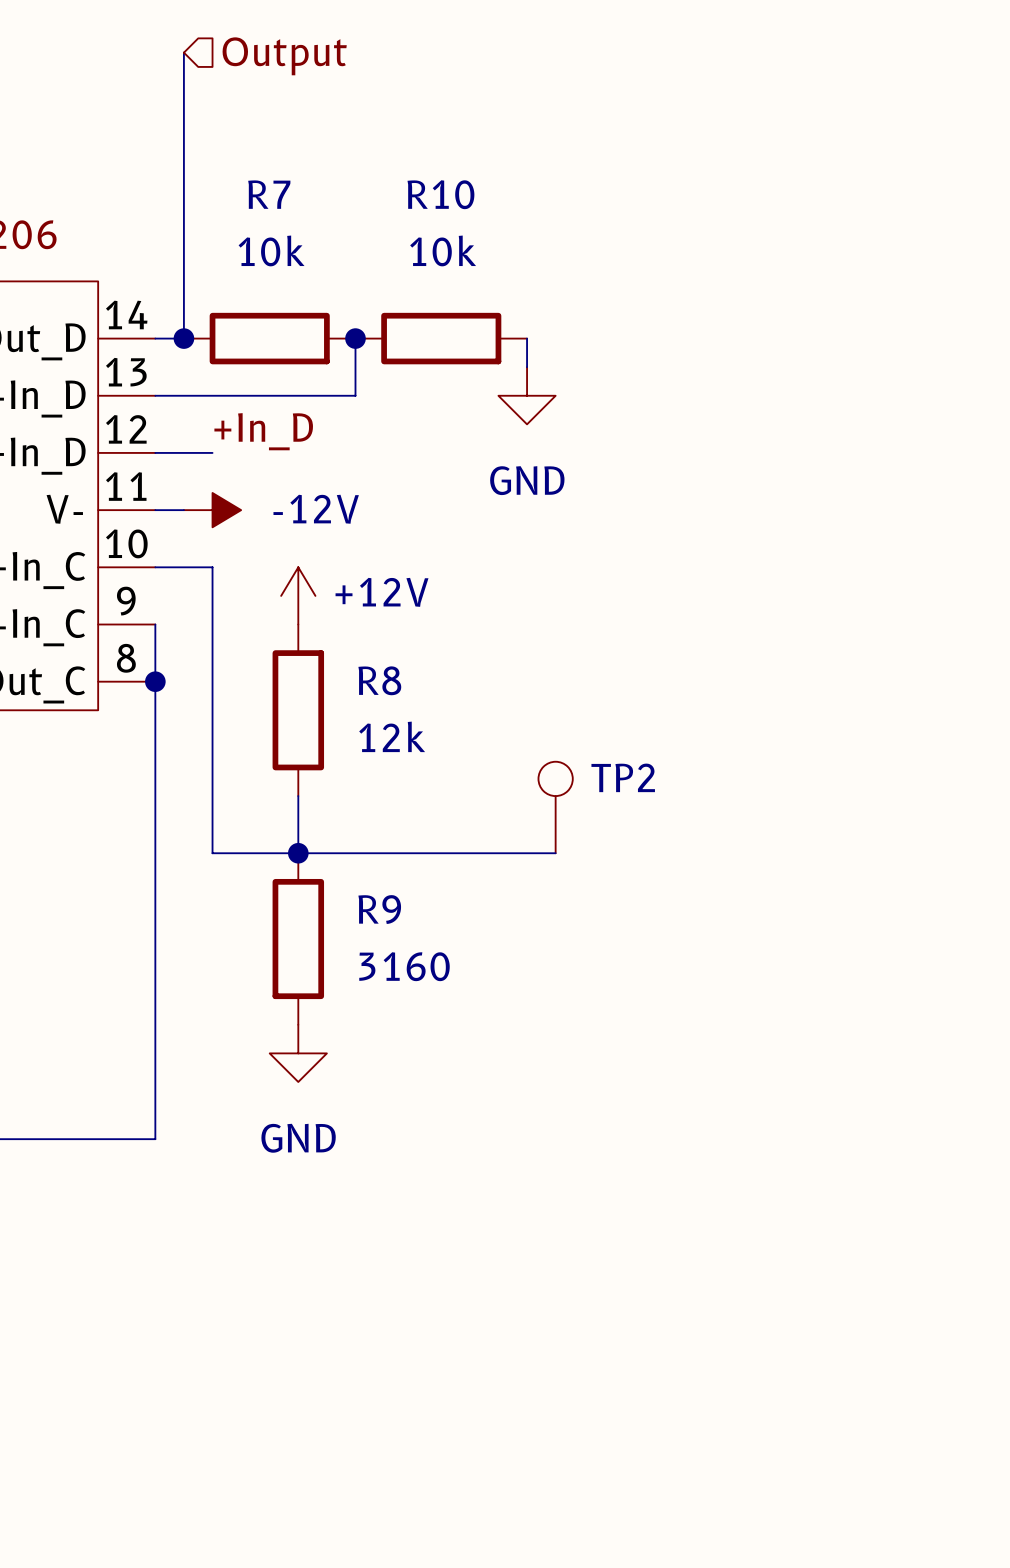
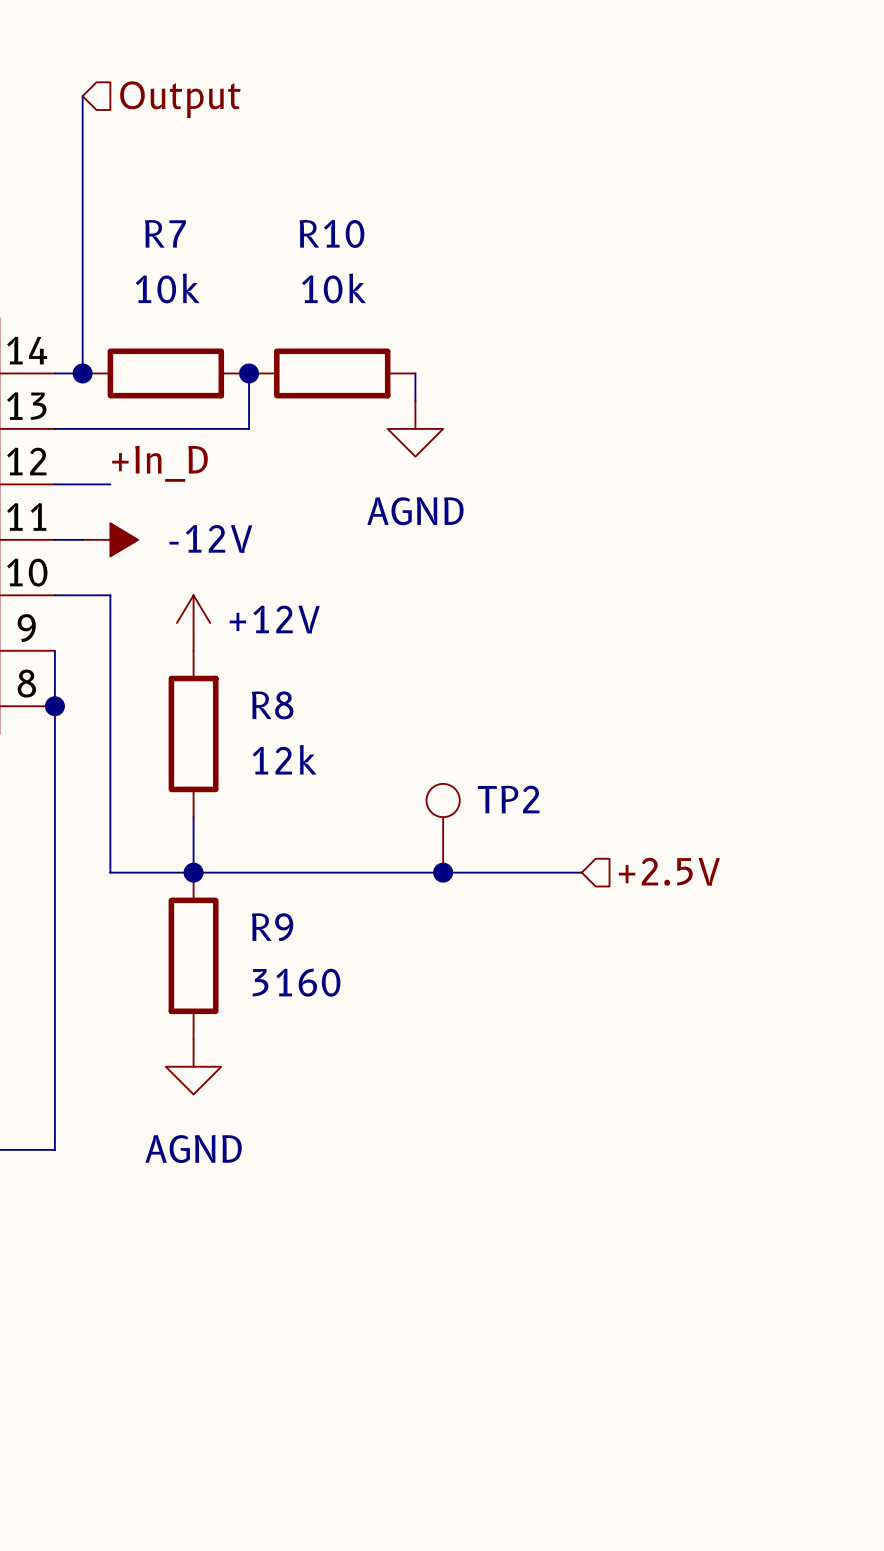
power symbol: GND (527, 395) -> AGND (415, 428)
hierarchical label: none -> +2.5V (669, 871)
wire: none -> (443, 872) (581, 872)
junction: none -> (443, 872)
power symbol: GND (298, 1053) -> AGND (193, 1066)

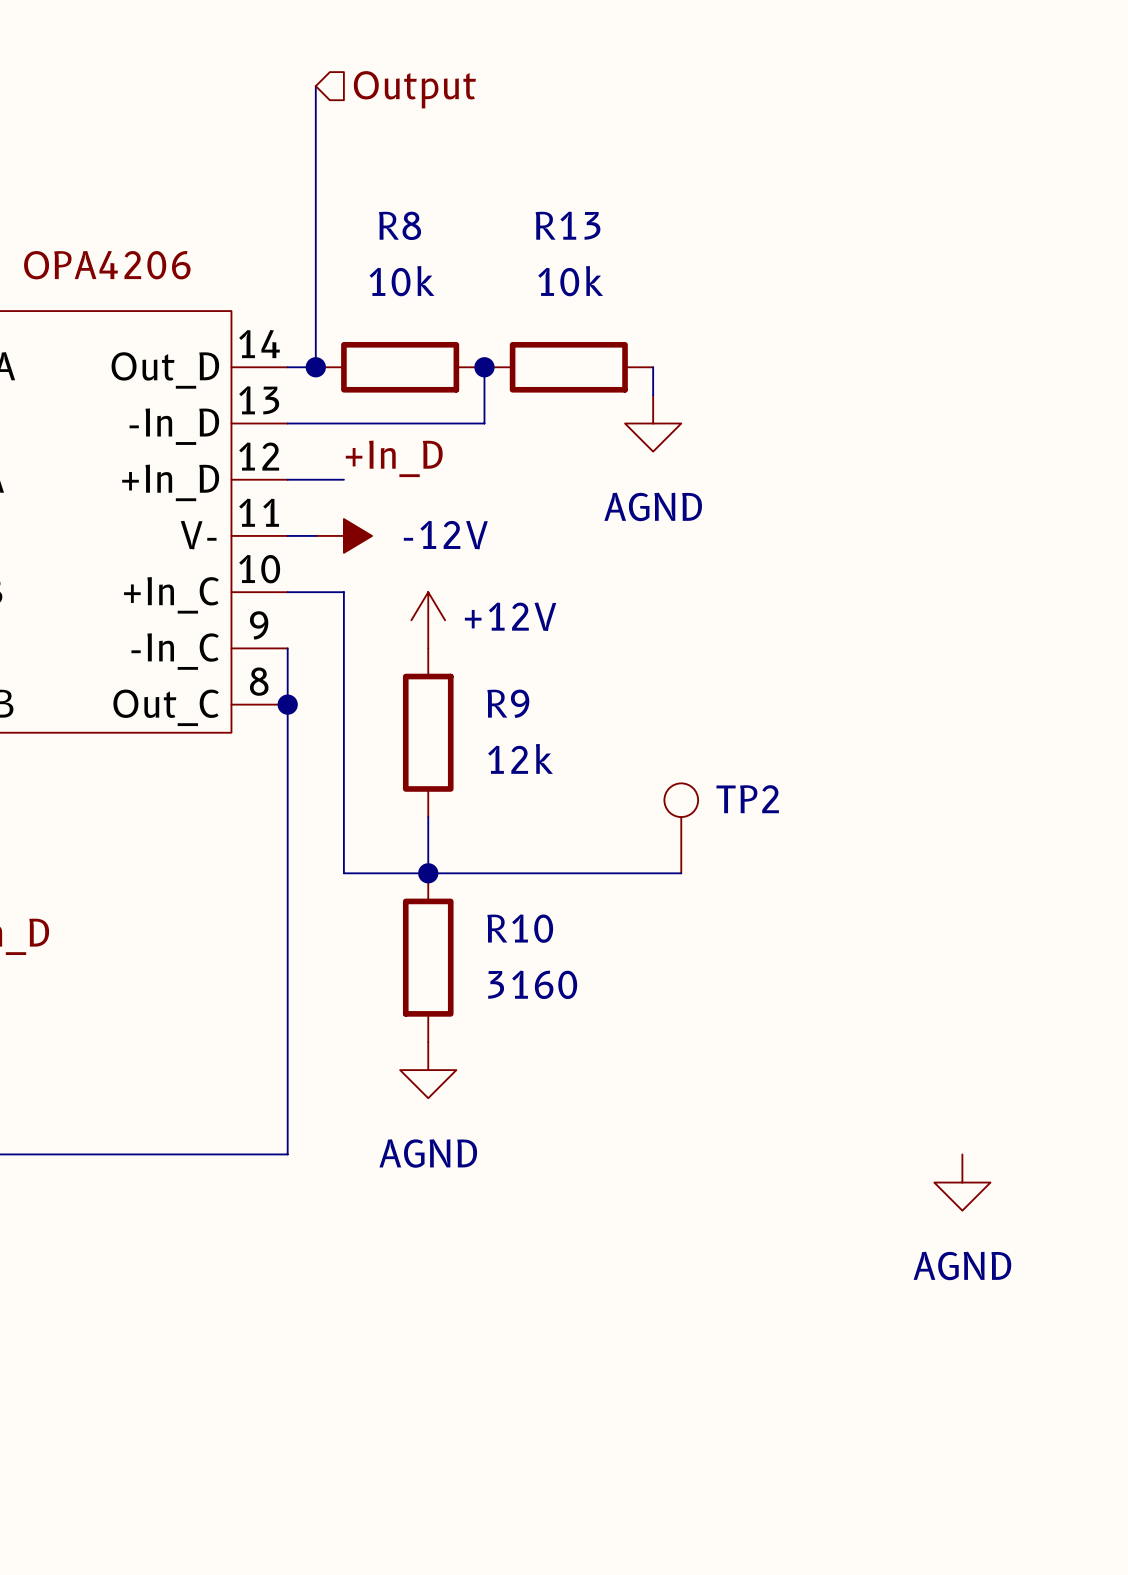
R7 name: R7 (165, 233) -> R8 (400, 225)
R10 name: R10 (331, 233) -> R13 (568, 225)
R8 name: R8 (272, 705) -> R9 (508, 703)
hierarchical label: +2.5V (669, 871) -> none
wire: (443, 872) (581, 872) -> none
junction: (443, 872) -> none
R9 name: R9 (272, 927) -> R10 (520, 928)
power symbol: none -> AGND (962, 1182)

